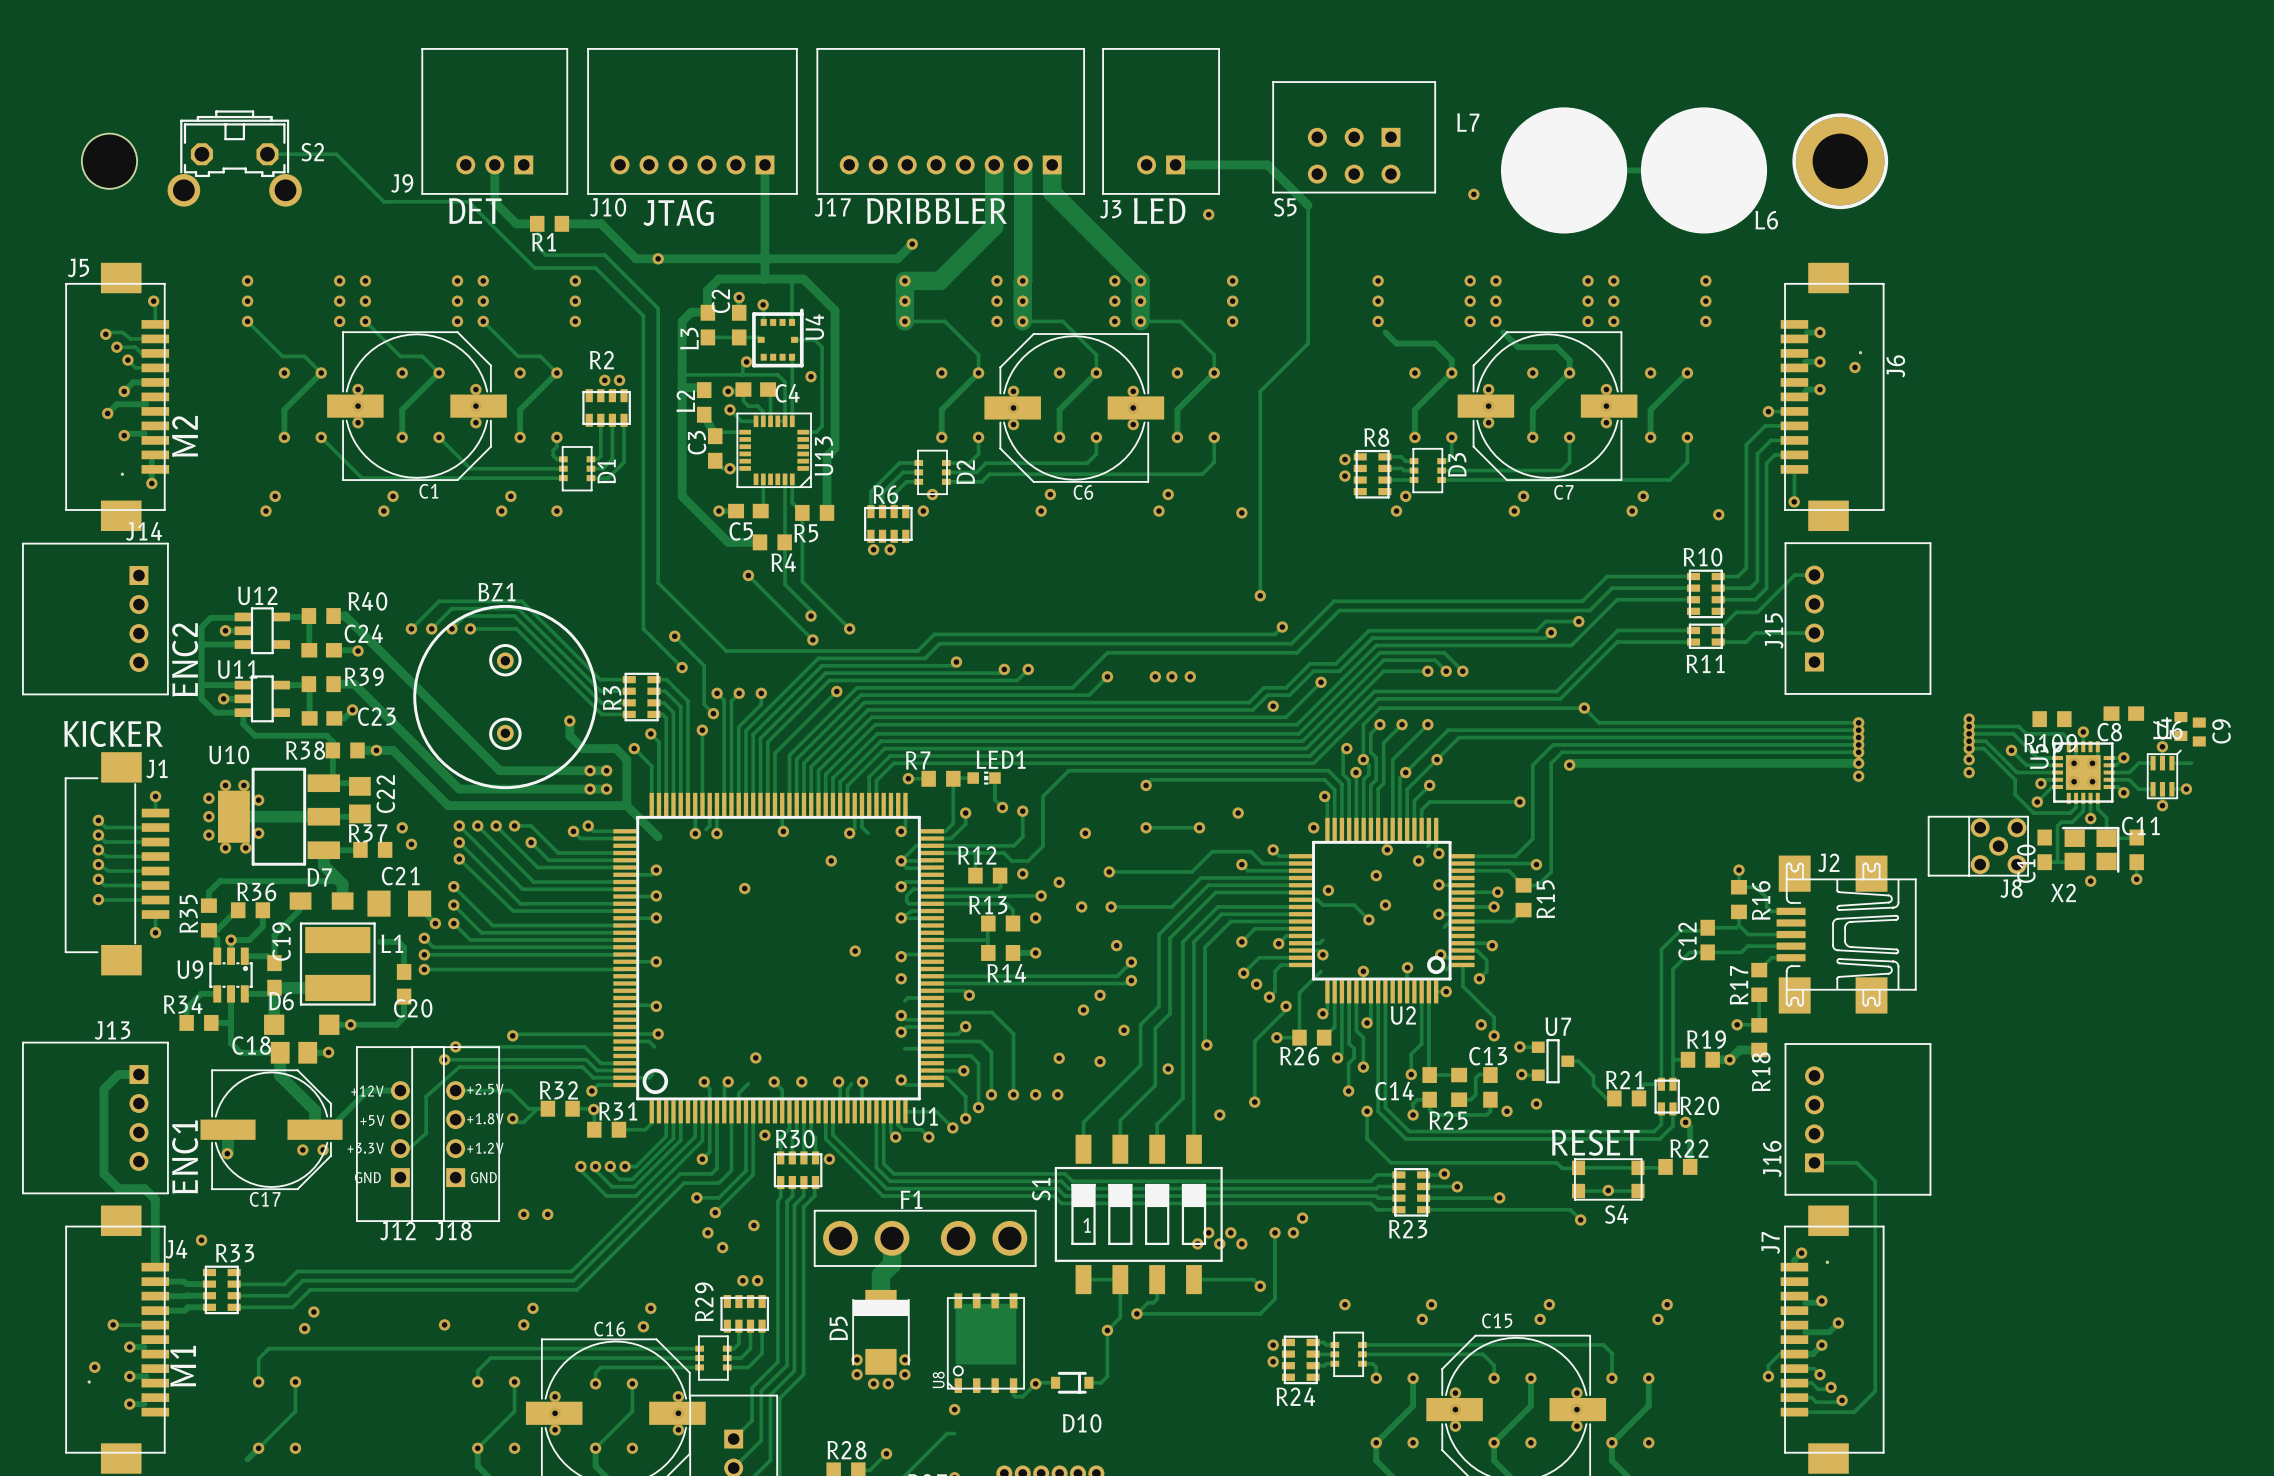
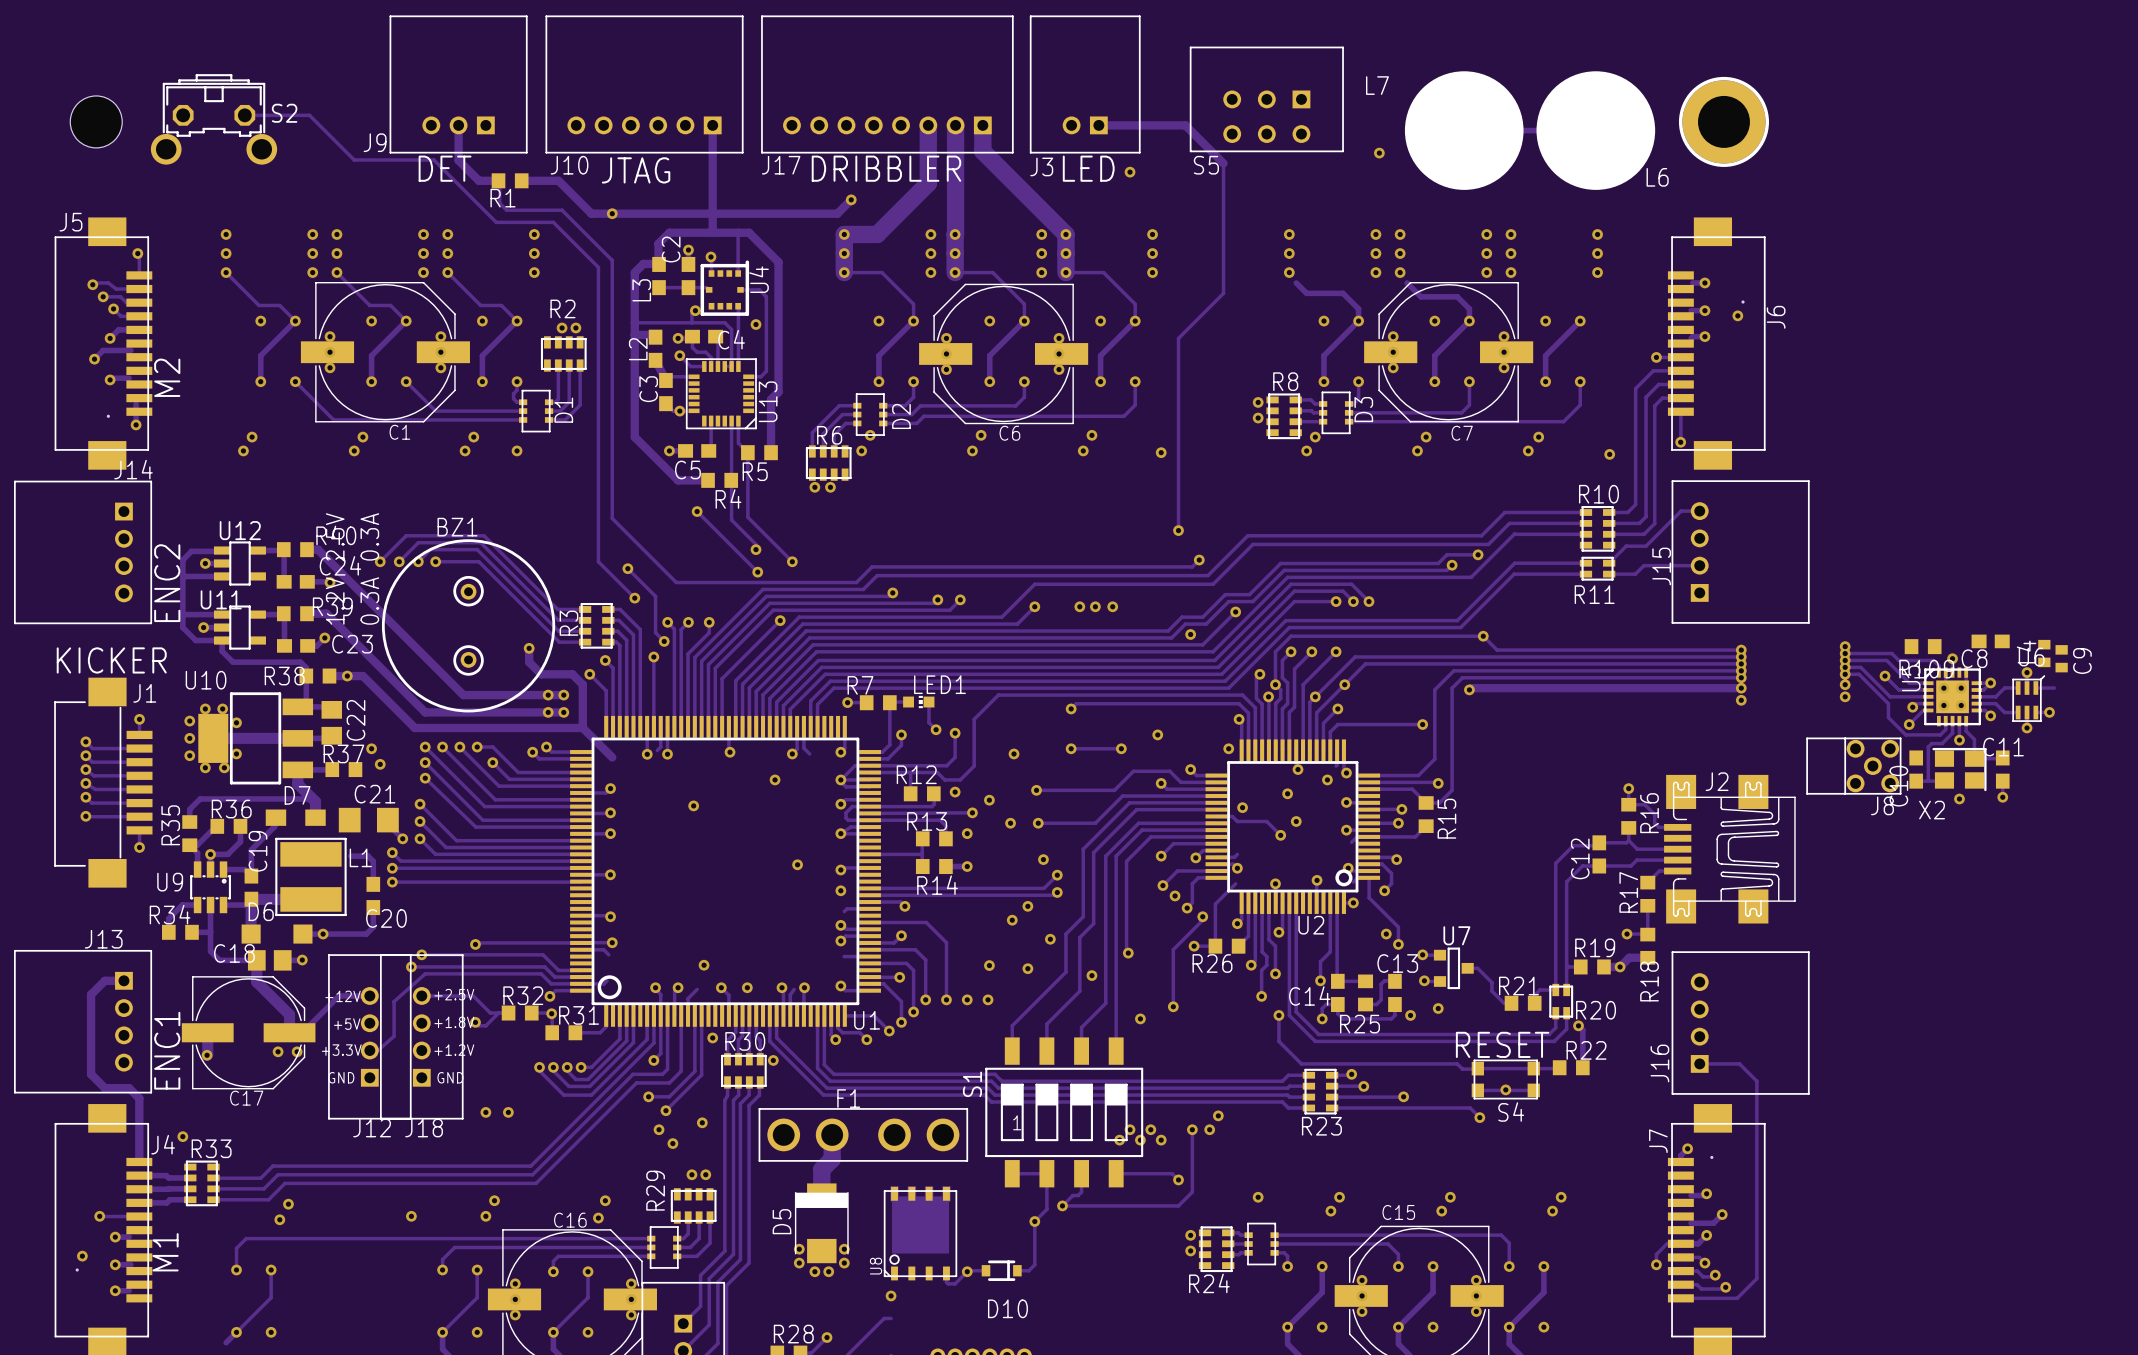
U12 text: none -> 2.5V (335, 537)
U12 text: none -> 0.3A (369, 536)
U11 text: none -> 1.2V (335, 601)
U11 text: none -> 0.3A (369, 601)

